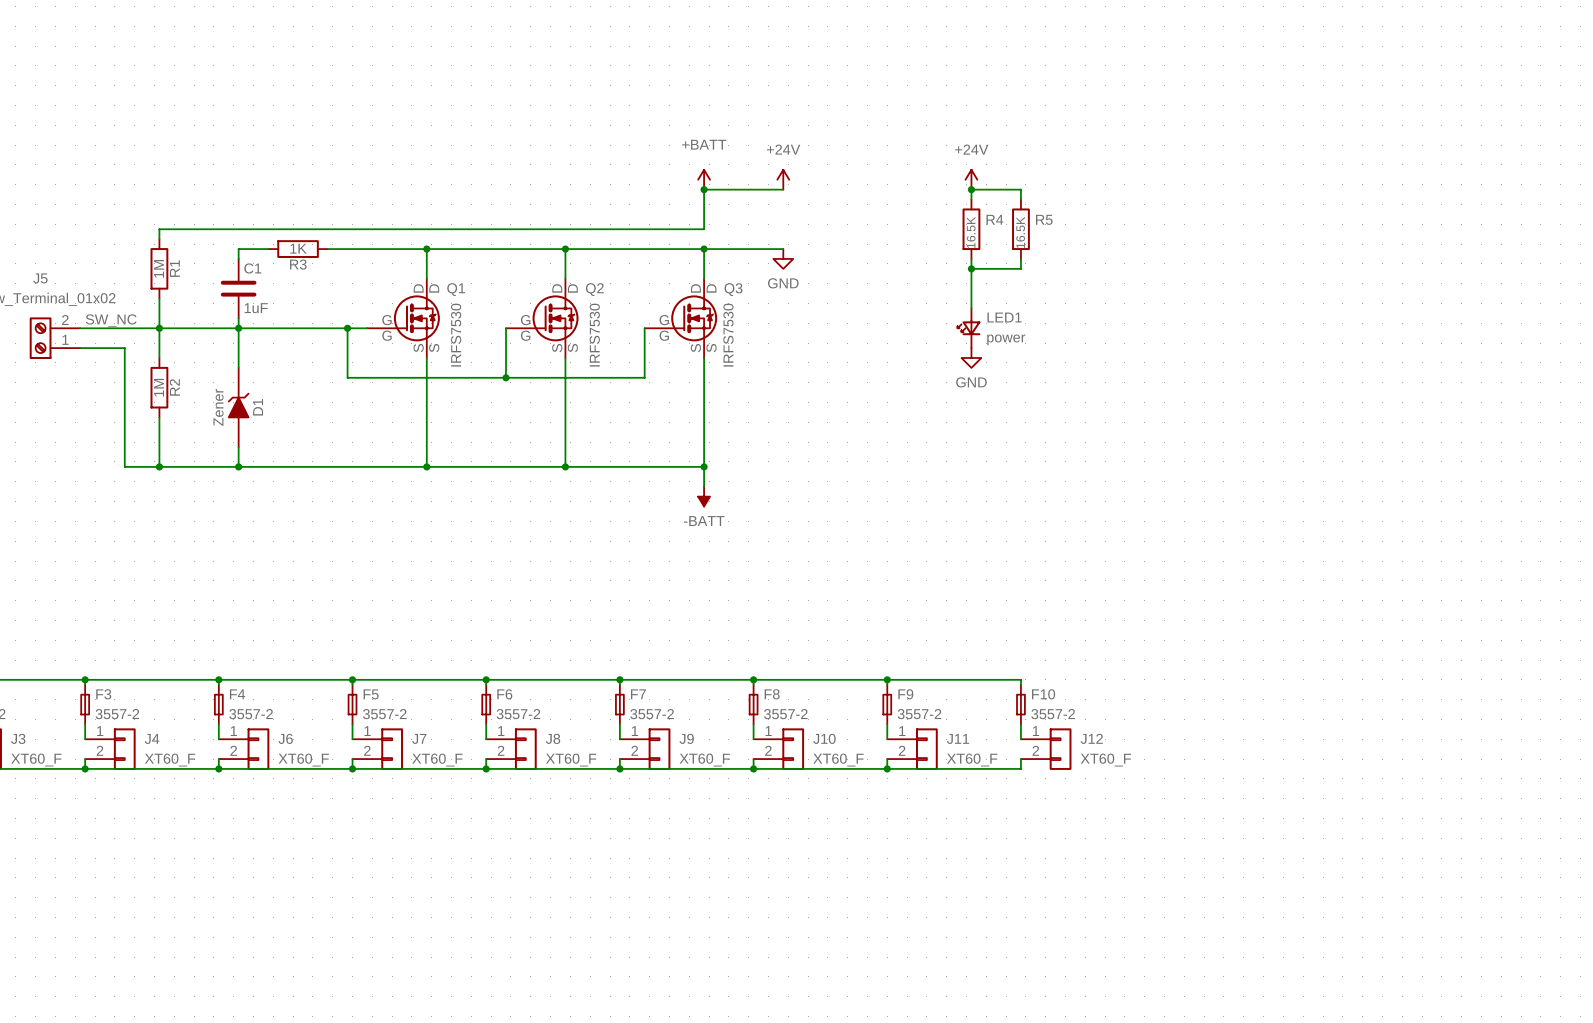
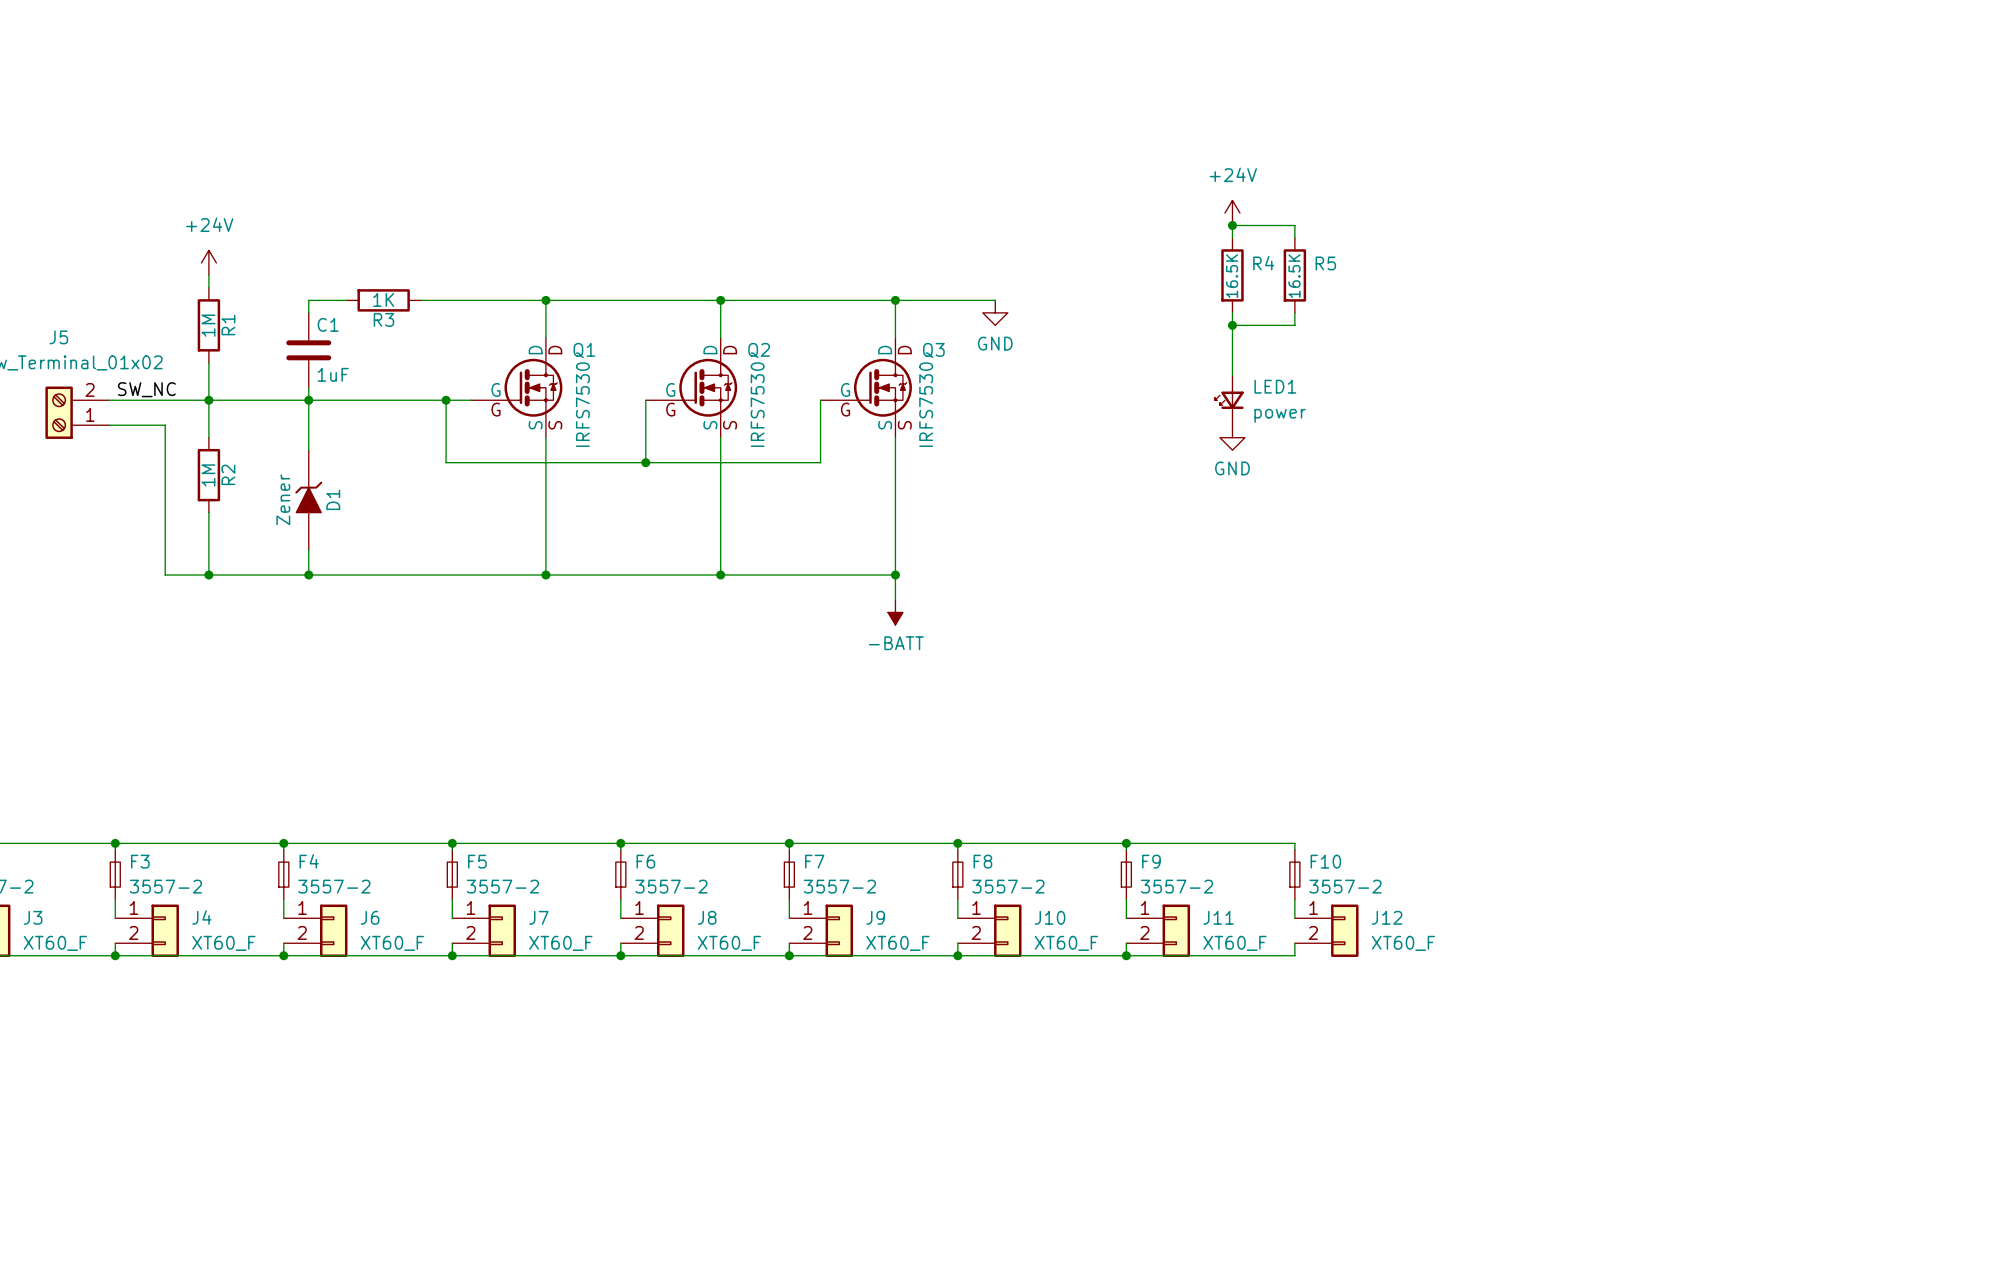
power symbol: +BATT (704, 179) -> none
power symbol: +24V (783, 179) -> none
junction: (704, 189) -> none
wire: (783, 189) (704, 189) (704, 229) (159, 229) -> none
power symbol: none -> +24V (208, 262)

